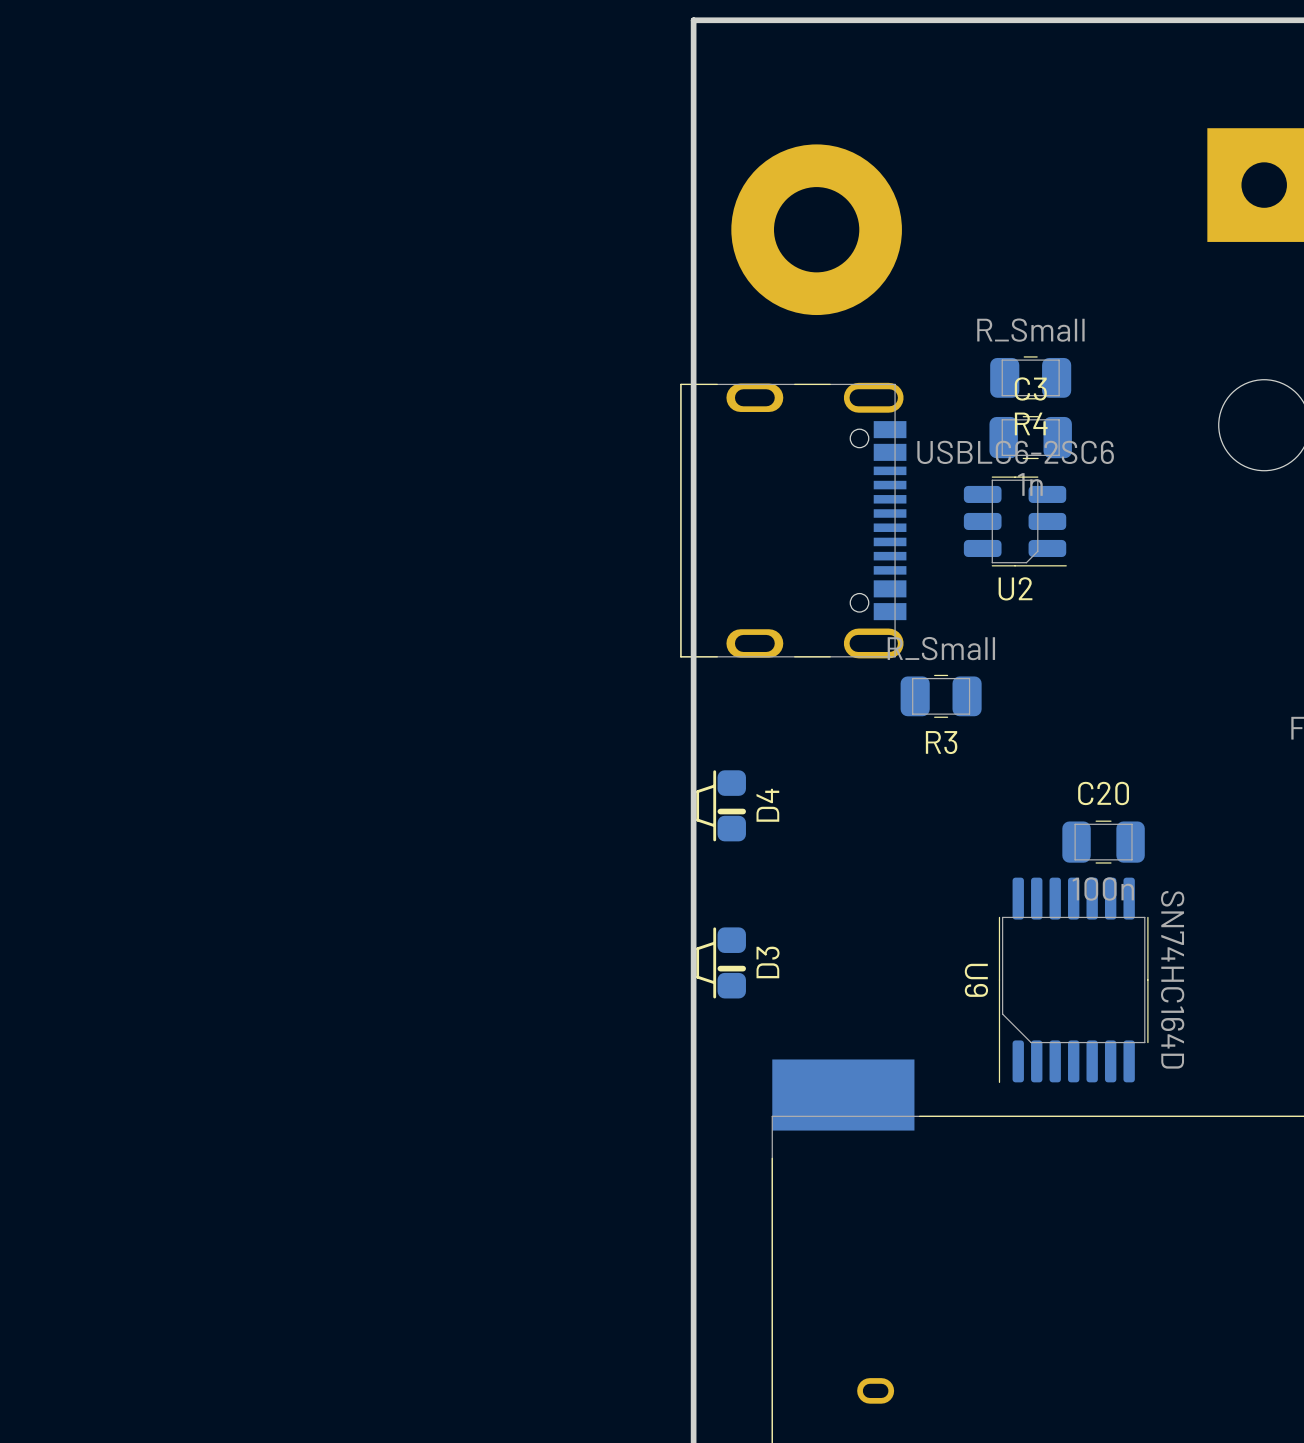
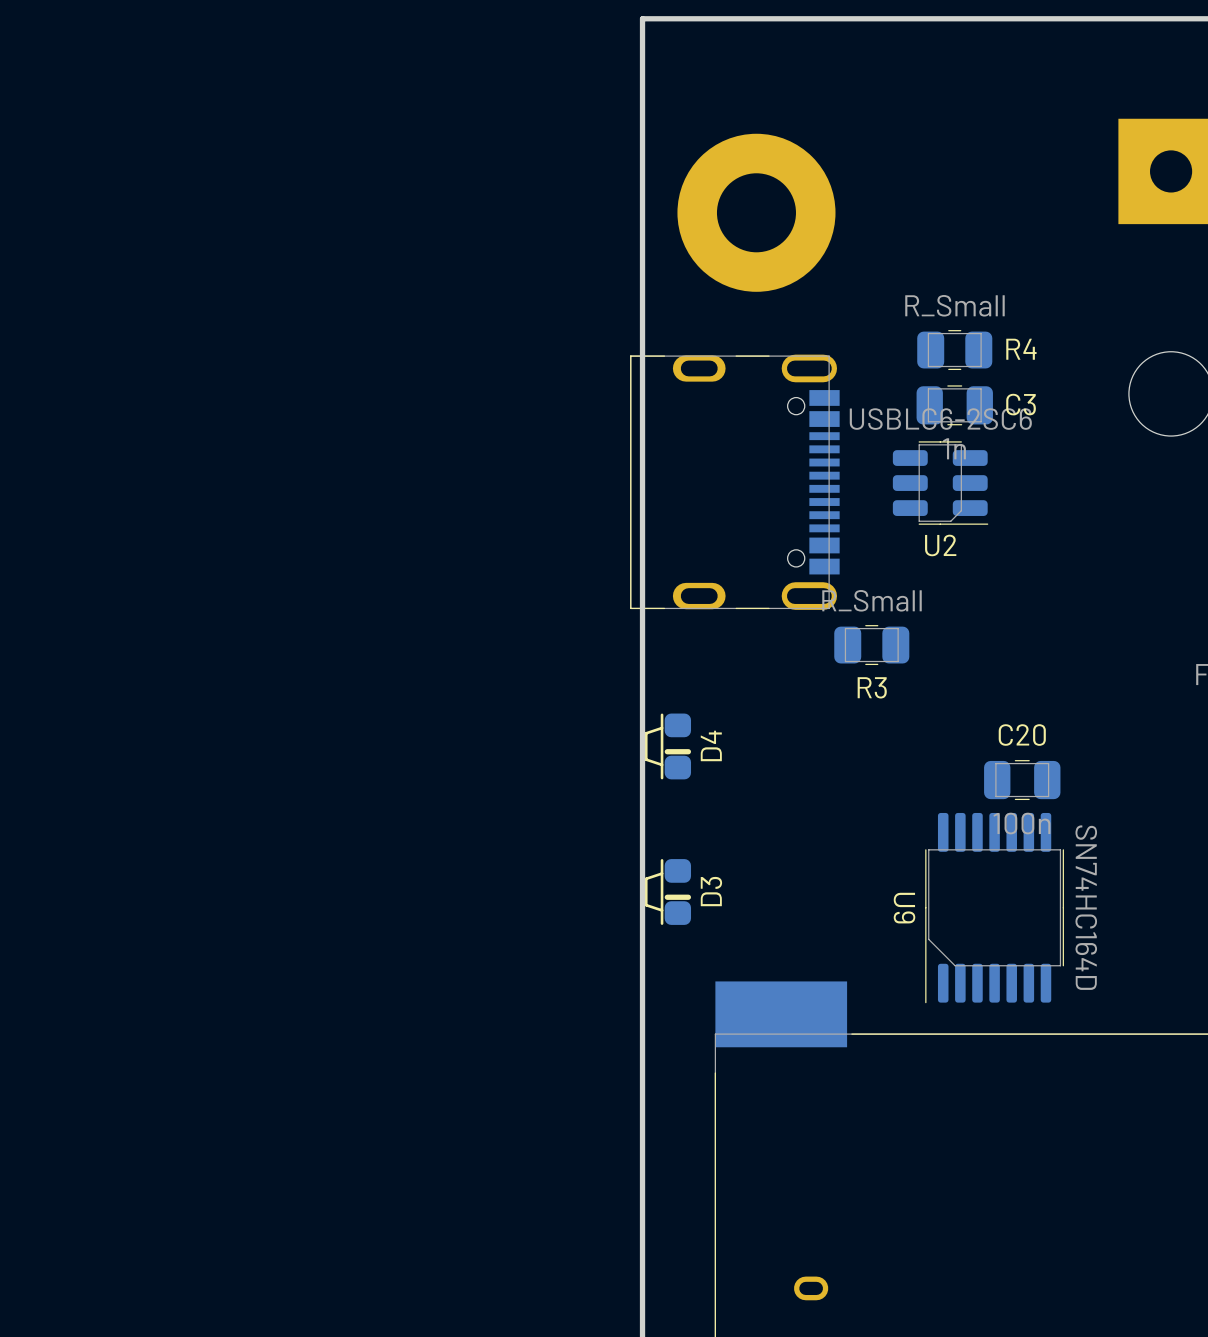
C3 name position: C3 (1030, 388) -> C3 (1021, 404)
R4 name position: R4 (1031, 423) -> R4 (1021, 349)

